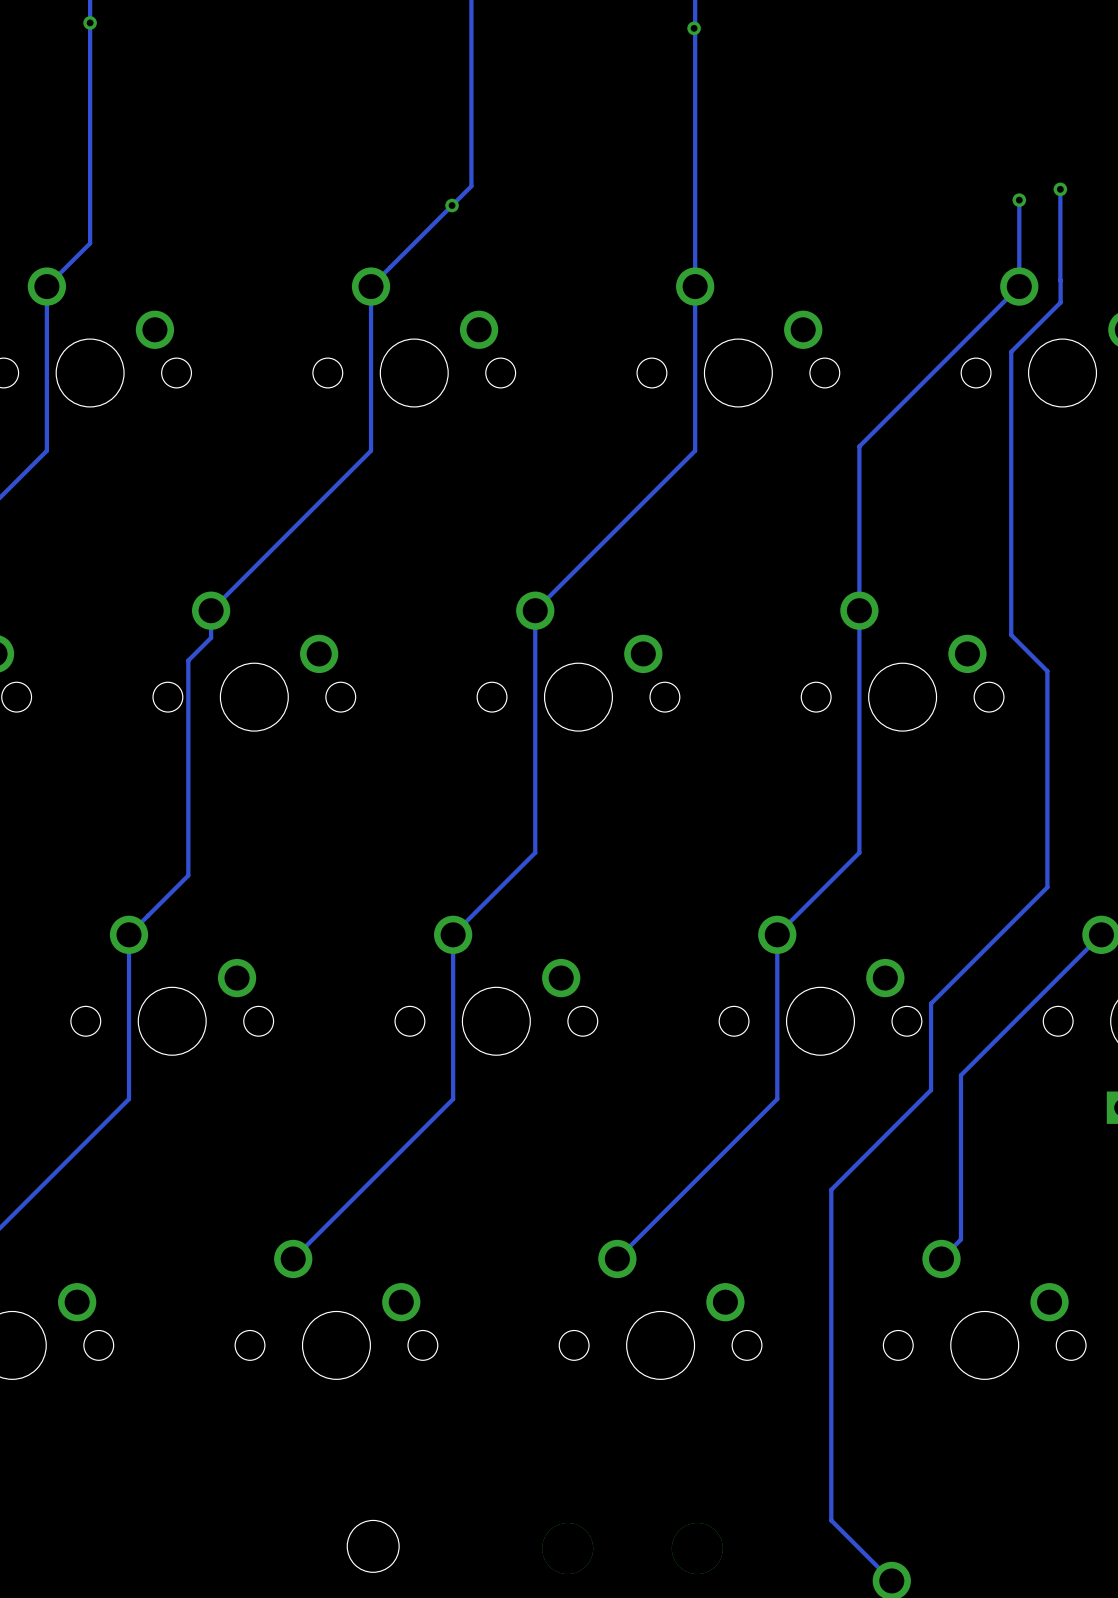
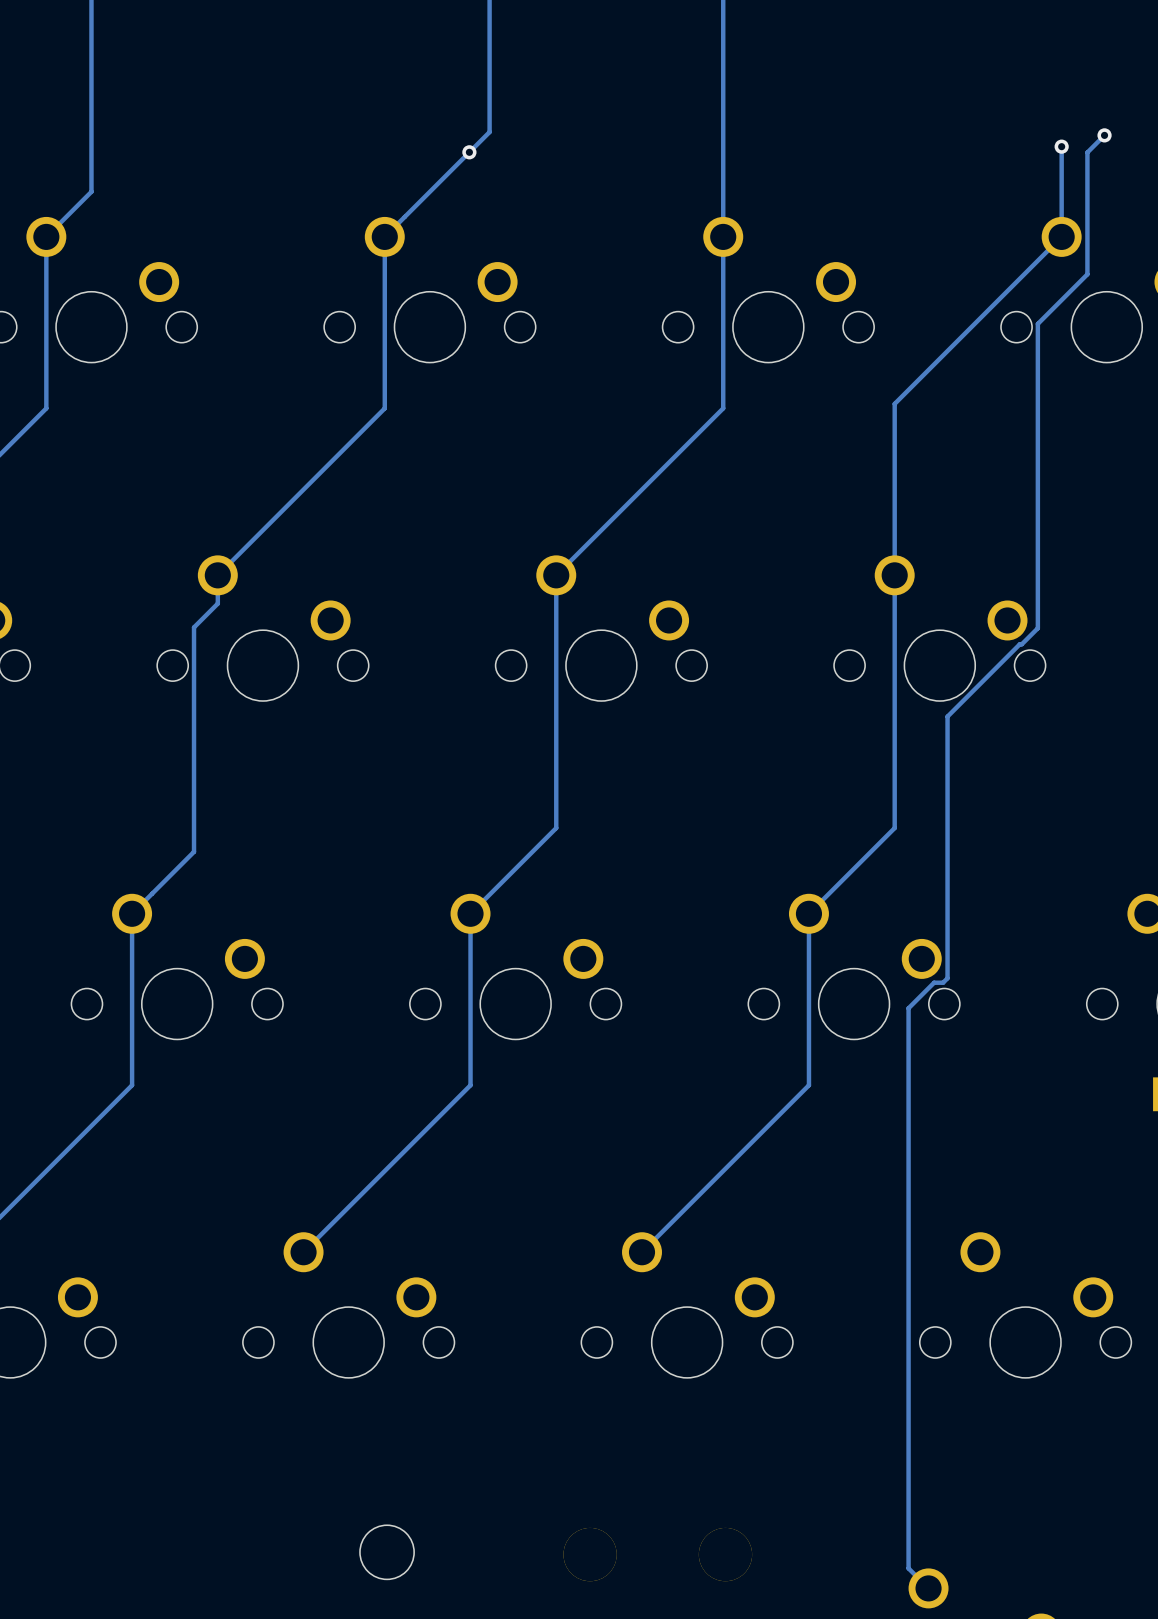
track: (1060, 189) (1060, 302) (1011, 351) (1011, 635) (1047, 671) (1047, 887) (931, 1003) (931, 1090) (831, 1189) (831, 1520) (872, 1561) -> (1104, 135) (1087, 152) (1087, 274) (1037, 323) (1037, 628) (947, 716) (947, 978) (943, 982) (934, 982) (908, 1008) (908, 1568)
track: (1101, 934) (960, 1075) (960, 1239) (941, 1258) -> none

